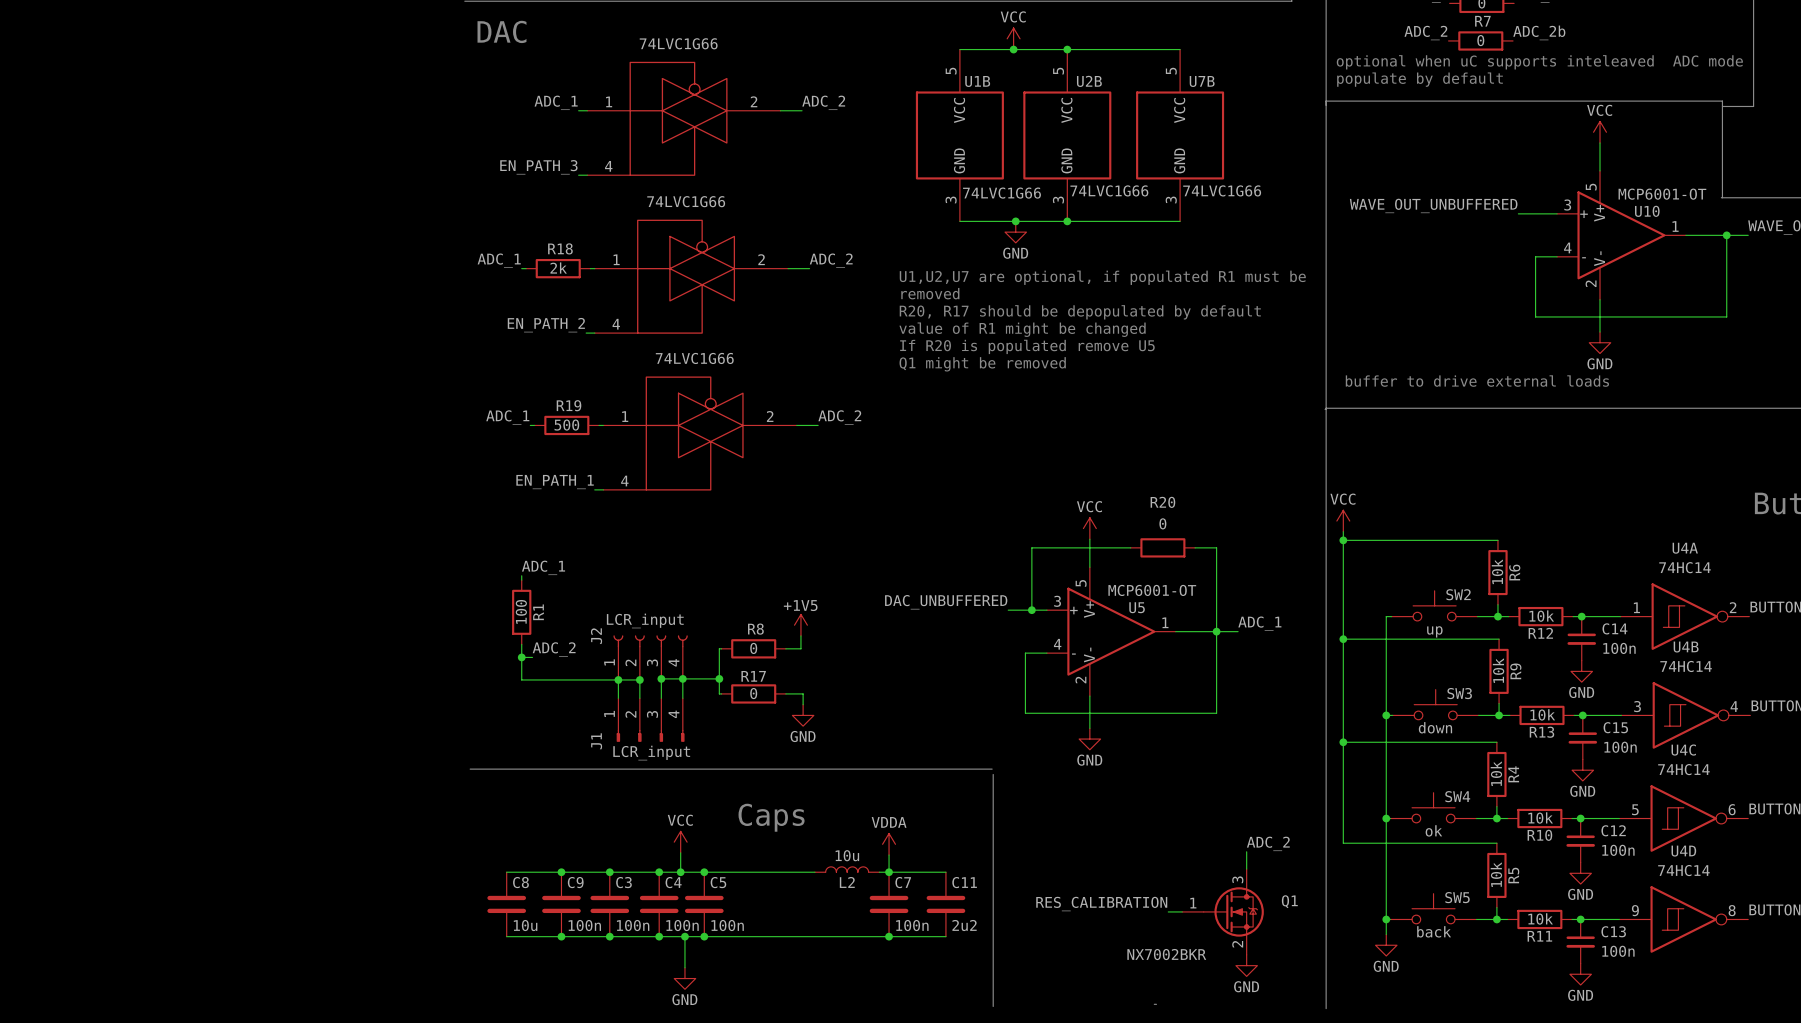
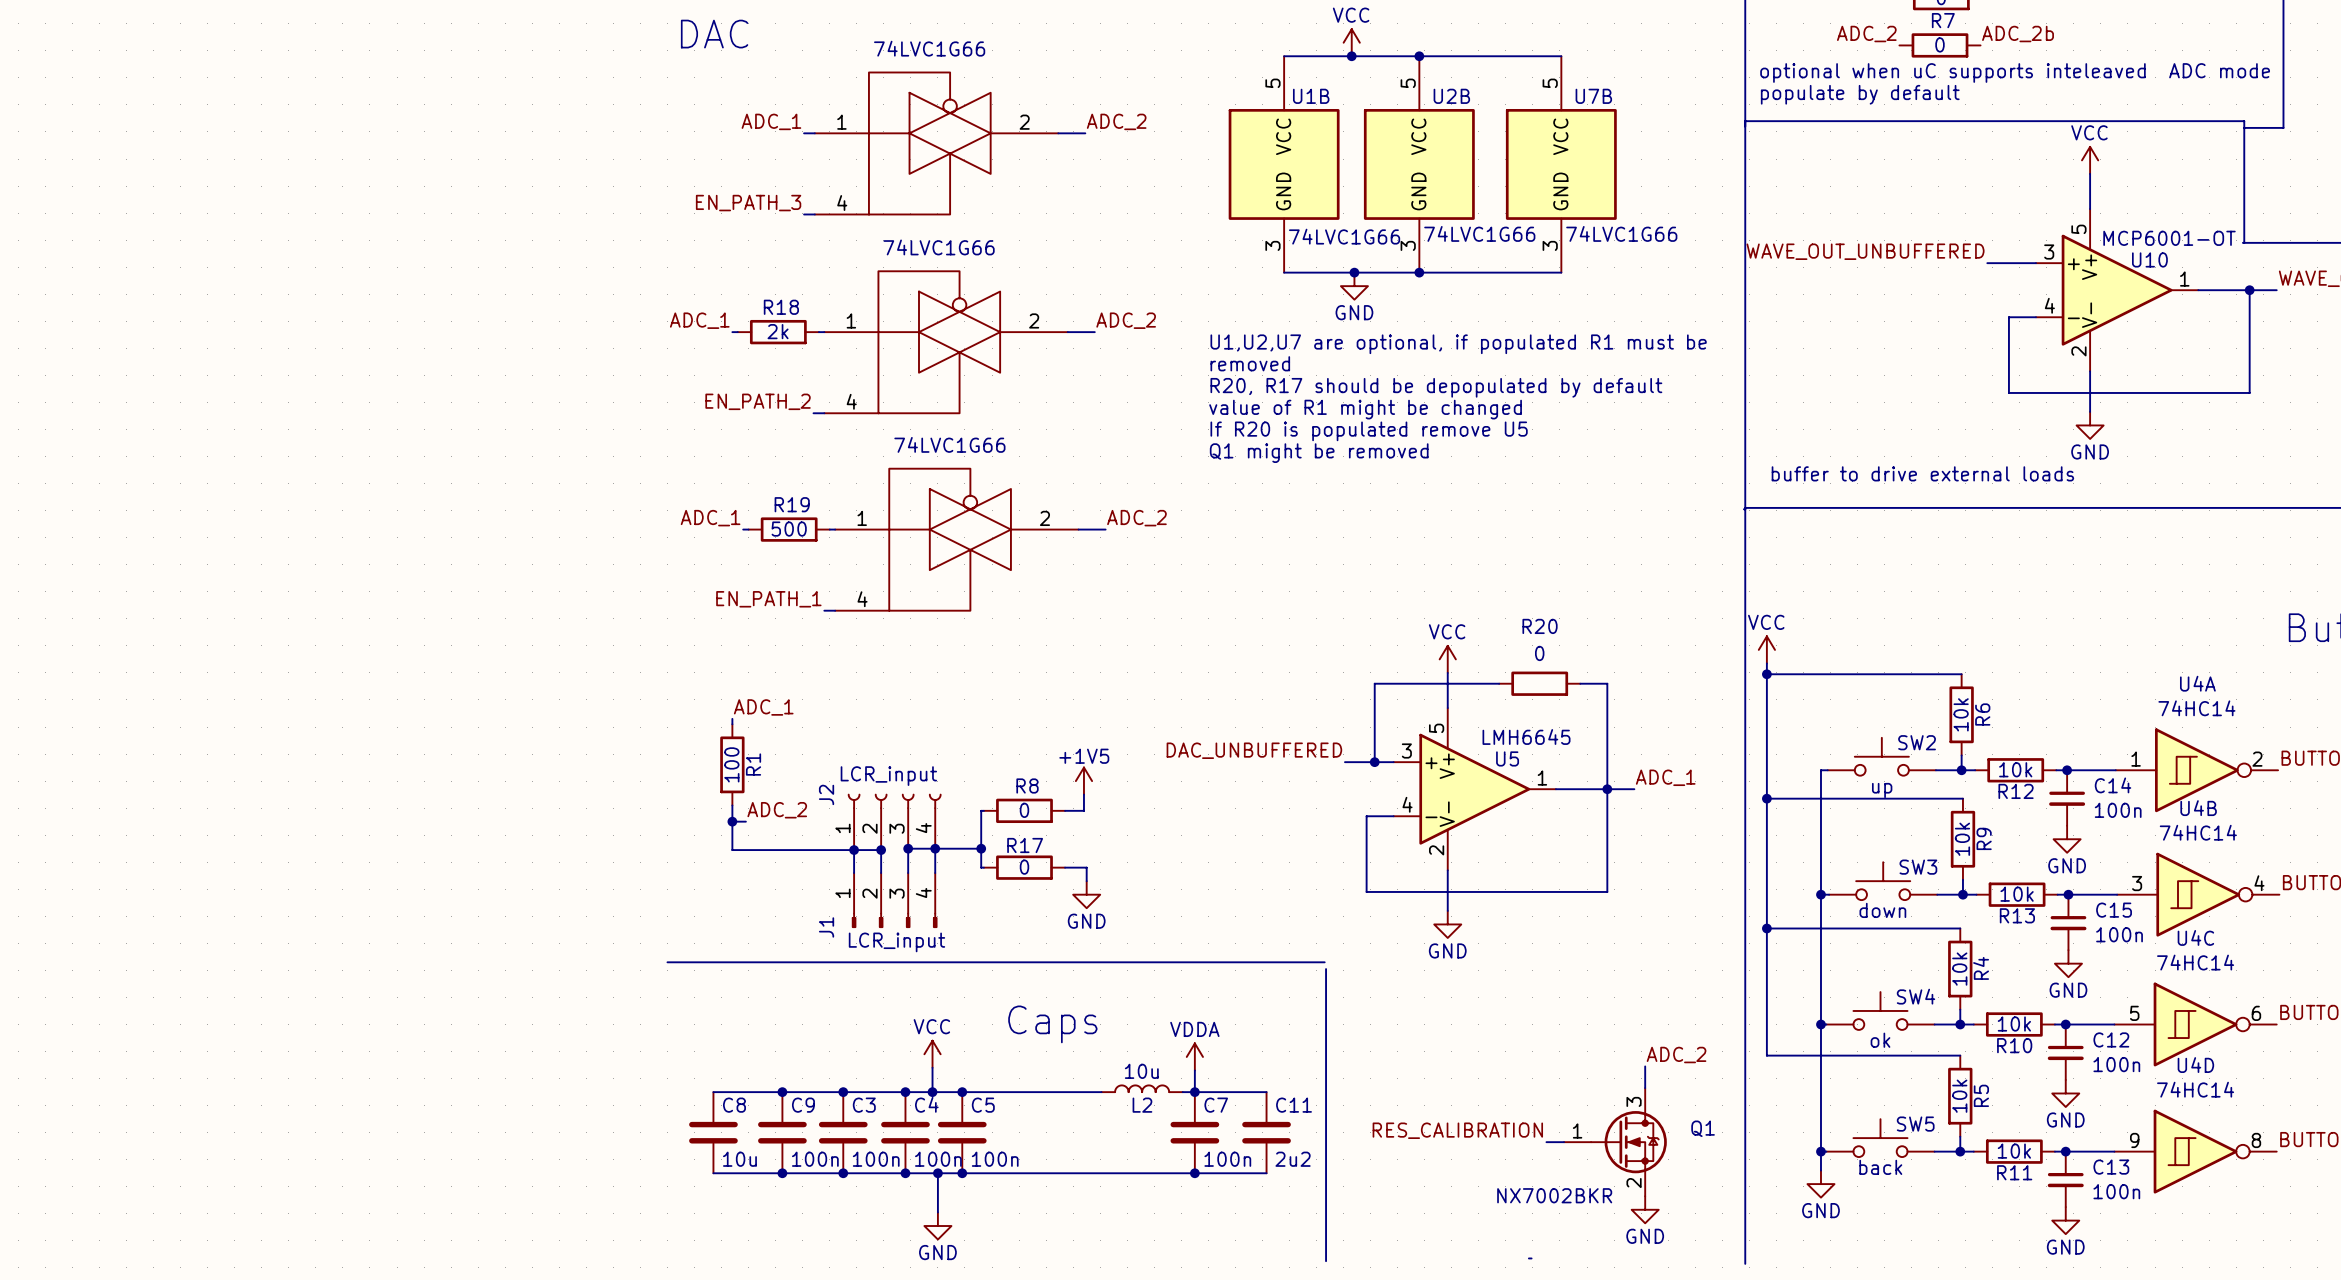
U5 value: MCP6001-OT (1152, 590) -> LMH6645 (1526, 736)

